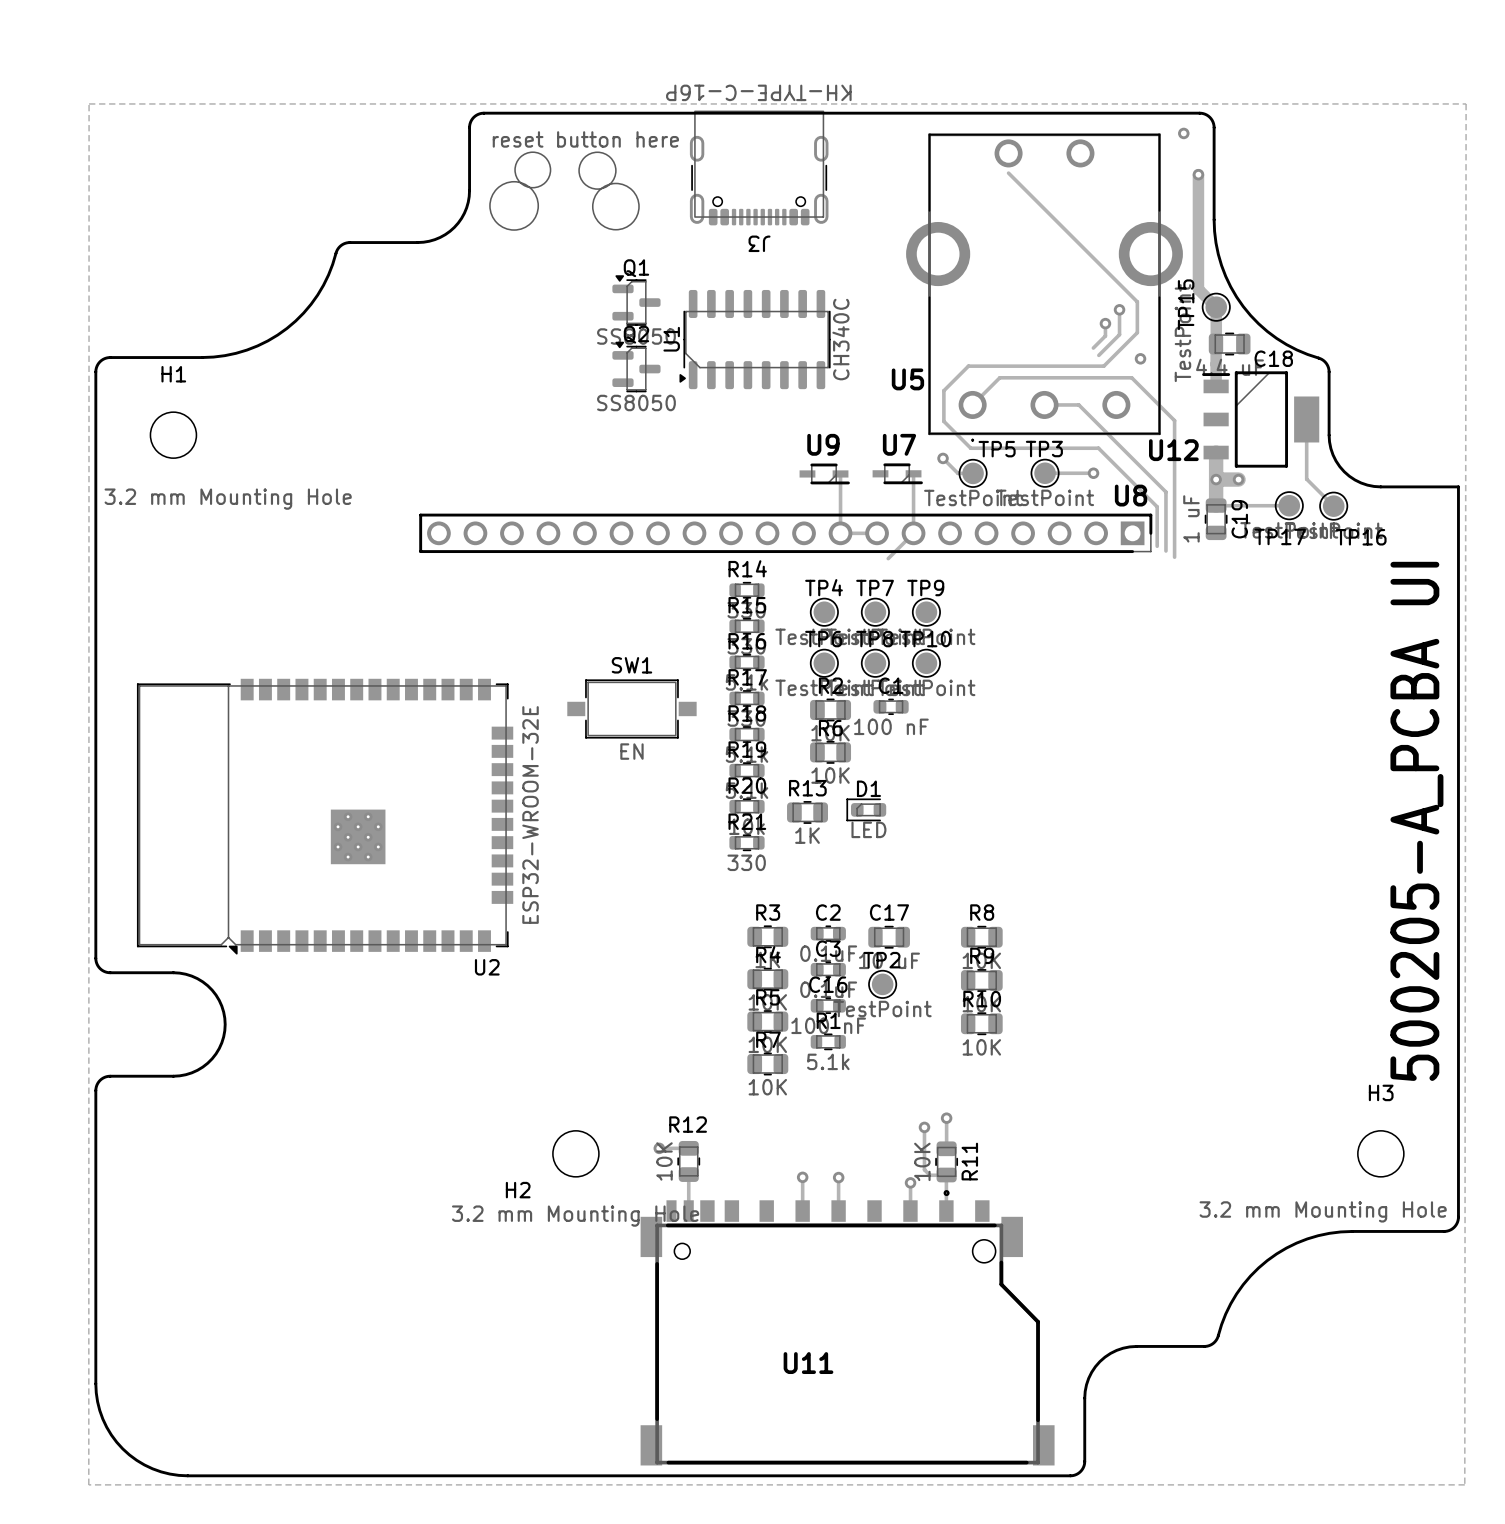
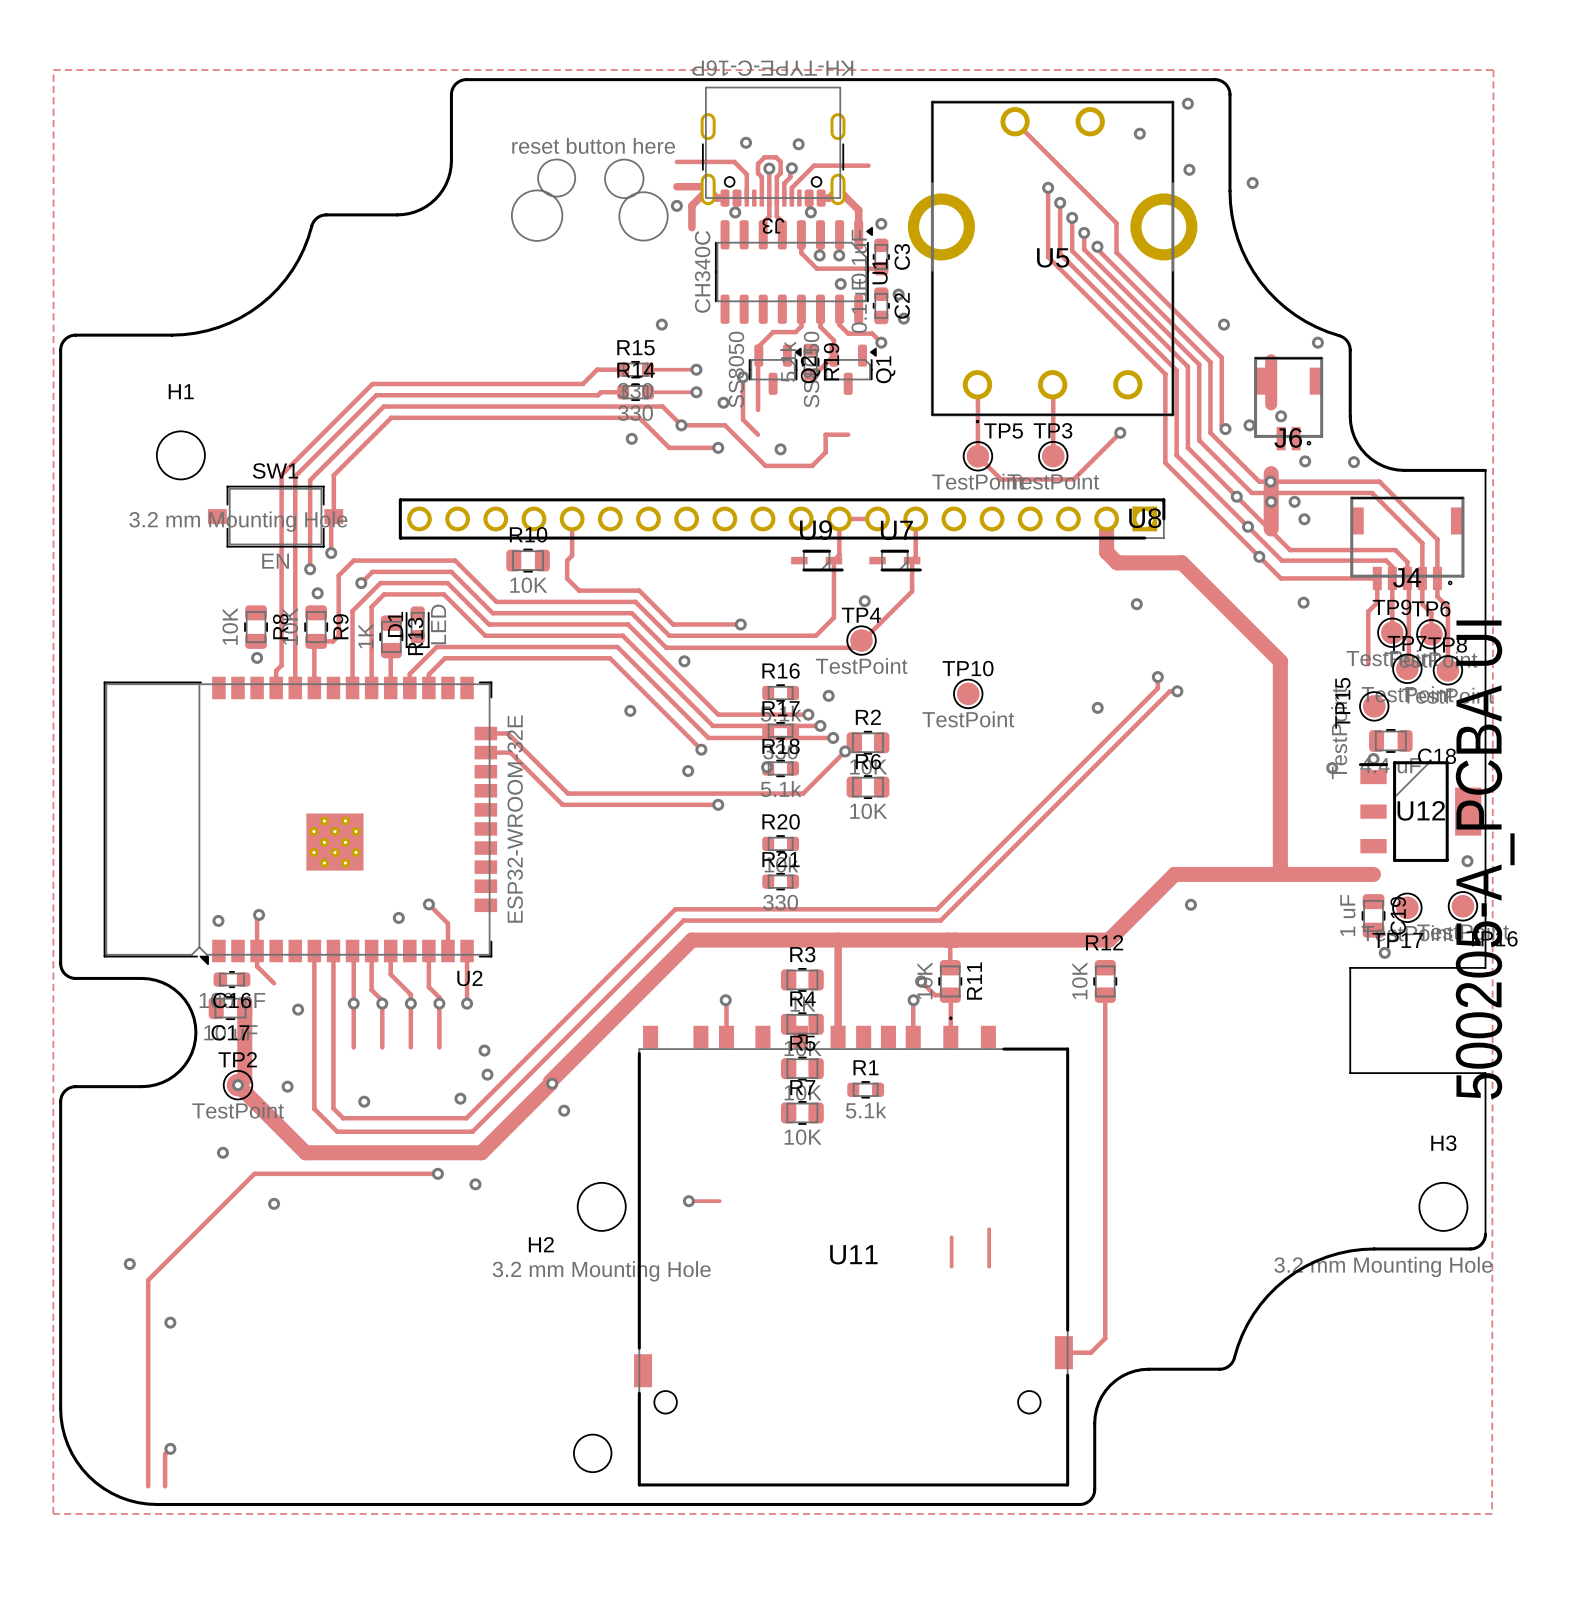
via: none -> (1187, 103)
zone outline: (89, 103) (88, 1484) (1464, 1484) (1466, 103) (89, 103) -> (53, 70) (53, 1513) (1492, 1513) (1493, 70) (53, 70)
board edge: (483, 113) (1205, 114) (1211, 118) (1213, 125) (1214, 231) (1218, 254) (1225, 276) (1243, 306) (1267, 331) (1286, 344) (1320, 358) (1327, 364) (1329, 371) (1329, 441) (1333, 454) (1339, 466) (1354, 479) (1374, 486) (1458, 486) (1457, 1221) (1453, 1228) (1445, 1231) (1340, 1231) (1307, 1238) (1276, 1253) (1250, 1276) (1230, 1303) (1217, 1338) (1211, 1344) (1204, 1346) (1129, 1346) (1110, 1353) (1095, 1366) (1086, 1384) (1084, 1463) (1081, 1470) (1076, 1474) (178, 1475) (152, 1468) (129, 1454) (116, 1442) (102, 1419) (97, 1401) (95, 1383) (96, 1086) (101, 1079) (108, 1076) (179, 1075) (197, 1070) (212, 1058) (219, 1048) (223, 1036) (225, 1024) (223, 1012) (219, 1000) (212, 990) (197, 978) (179, 973) (108, 972) (100, 968) (96, 961) (96, 368) (101, 360) (108, 357) (213, 357) (247, 350) (277, 335) (303, 312) (323, 285) (337, 250) (342, 244) (349, 242) (423, 242) (445, 234) (458, 223) (466, 207) (469, 190) (469, 125) (473, 117) (483, 113) -> (466, 79) (457, 82) (451, 92) (451, 160) (448, 178) (439, 194) (426, 206) (403, 214) (326, 214) (318, 217) (312, 223) (298, 259) (278, 288) (250, 311) (218, 327) (183, 334) (73, 335) (65, 339) (61, 346) (61, 966) (66, 975) (73, 978) (141, 978) (162, 982) (174, 989) (188, 1005) (194, 1018) (195, 1032) (194, 1046) (184, 1065) (174, 1075) (162, 1082) (141, 1086) (73, 1086) (66, 1089) (61, 1097) (60, 1408) (62, 1427) (67, 1445) (82, 1469) (103, 1488) (120, 1497) (147, 1504) (1086, 1503) (1091, 1498) (1094, 1491) (1094, 1423) (1096, 1409) (1105, 1390) (1121, 1376) (1141, 1369) (1219, 1369) (1227, 1366) (1233, 1360) (1247, 1324) (1268, 1295) (1295, 1272) (1327, 1256) (1362, 1249) (1472, 1248) (1479, 1245) (1484, 1238) (1485, 1073) (1350, 1073) (1350, 967) (1485, 967) (1485, 470) (1397, 469) (1377, 463) (1361, 449) (1354, 437) (1350, 423) (1350, 350) (1348, 342) (1341, 336) (1305, 321) (1285, 307) (1260, 281) (1242, 250) (1234, 227) (1230, 203) (1229, 92) (1226, 85) (1220, 80) (466, 79)
track: none -> (1015, 121) (1116, 223) (1116, 252) (1221, 357) (1221, 425) (1225, 429)
via: none -> (1139, 133)
via: (1183, 133) -> none
via: none -> (746, 142)
via: none -> (798, 144)
track: none -> (676, 161) (734, 161) (746, 174) (746, 198)
track: none -> (868, 165) (814, 165) (791, 187) (791, 198)
track: none -> (769, 168) (769, 189)
via: none -> (769, 168)
track: none -> (791, 168) (790, 177) (784, 183) (784, 198)
via: none -> (791, 168)
via: none -> (1189, 169)
J3 position: (759, 168) -> (773, 146)
track: (1008, 173) (1137, 301) (1137, 332) (1103, 366) (968, 366) (943, 390) (943, 421) (970, 448) (1098, 448) (1157, 506) (1157, 546) -> none
track: (1198, 174) (1198, 289) (1216, 307) (1215, 344) -> none
track: none -> (676, 186) (705, 186)
track: none -> (1048, 187) (1048, 256) (1165, 374) (1165, 462) (1280, 578) (1377, 578) (1377, 602) (1368, 611) (1368, 664)
via: none -> (1048, 187)
track: none -> (761, 189) (761, 177) (758, 173) (758, 163) (764, 157) (776, 157) (780, 161) (780, 173) (776, 177) (776, 189)
track: none -> (724, 198) (716, 198) (708, 189) (691, 205) (691, 227)
track: none -> (769, 198) (769, 216) (763, 222)
track: none -> (776, 198) (776, 216) (782, 222)
track: none -> (821, 198) (829, 198) (838, 189) (858, 210) (858, 234)
track: none -> (1060, 202) (1060, 253) (1176, 370) (1176, 455) (1281, 560) (1386, 560) (1392, 566) (1392, 632)
via: none -> (1060, 202)
via: none -> (676, 205)
via: none -> (735, 212)
via: none -> (810, 212)
track: none -> (1072, 217) (1072, 250) (1187, 366) (1187, 447) (1290, 550) (1395, 550) (1407, 562) (1407, 578)
via: none -> (1072, 217)
via: none -> (881, 223)
track: none -> (1084, 232) (1084, 249) (1199, 364) (1199, 440) (1251, 492) (1372, 492) (1422, 543) (1422, 604) (1431, 613) (1431, 634)
via: none -> (1084, 232)
track: none -> (801, 234) (801, 253) (816, 268) (881, 268)
track: none -> (1097, 246) (1097, 249) (1210, 362) (1210, 432) (1259, 481) (1379, 481) (1437, 539) (1437, 596) (1447, 607) (1447, 670)
via: none -> (1097, 246)
via: none -> (819, 255)
via: none -> (839, 255)
via: none -> (840, 284)
via: none -> (898, 294)
U5 position: (1044, 287) -> (1052, 261)
track: none -> (801, 309) (801, 326) (795, 332) (773, 332) (758, 346) (758, 355)
track: none -> (820, 309) (820, 326) (833, 340) (833, 355) (814, 374)
track: none -> (839, 309) (839, 324) (848, 333) (872, 333) (881, 342)
Q1 rotation: 0° (636, 300) -> 90° clockwise (850, 369)
Q1 position: (636, 300) -> (850, 369)
via: none -> (903, 318)
TP15 position: (1216, 307) -> (1374, 706)
track: (1119, 309) (1119, 334) (1098, 355) -> none
via: (1119, 309) -> none
via: none -> (661, 324)
via: none -> (1223, 324)
track: (1105, 323) (1105, 335) (1093, 348) -> none
via: (1105, 323) -> none
via: none -> (881, 342)
via: none -> (1317, 342)
U1 rotation: 0° (755, 339) -> 180° (793, 272)
track: none -> (758, 356) (758, 409)
C18 position: (1229, 344) -> (1390, 740)
track: none -> (623, 369) (597, 369) (582, 383) (372, 383) (281, 474) (281, 665) (276, 670) (276, 687)
track: none -> (647, 369) (696, 369)
via: none -> (696, 369)
via: (1140, 358) -> none
track: none -> (743, 377) (743, 419) (758, 434)
via: none -> (743, 377)
Q2 rotation: 0° (636, 367) -> 90° clockwise (775, 369)
Q2 position: (636, 367) -> (775, 369)
track: none -> (977, 385) (977, 456) (1001, 479) (1073, 479) (1120, 432)
track: none -> (1053, 385) (1053, 456)
track: none -> (623, 392) (600, 392) (597, 395) (376, 395) (295, 476) (295, 687)
track: none -> (647, 392) (696, 392)
via: none -> (696, 392)
U5 name position: U5 (907, 379) -> U5 (1053, 257)
via: none -> (723, 402)
J6: none -> (1288, 403)
via: none -> (1281, 416)
track: (972, 404) (999, 377) (1131, 377) (1174, 420) (1174, 557) -> none
track: (1044, 404) (1078, 404) (1165, 492) (1165, 551) -> none
via: none -> (681, 425)
via: none -> (1249, 425)
via: none -> (1225, 429)
via: none -> (1120, 432)
track: none -> (848, 434) (825, 434) (825, 452) (812, 465) (765, 465) (724, 425) (681, 425) (662, 406) (383, 406) (310, 480) (310, 569)
via: none -> (631, 438)
U12 position: (1260, 419) -> (1420, 811)
track: (1306, 419) (1306, 479) (1333, 506) -> none
track: none -> (718, 447) (669, 447) (639, 417) (391, 417) (333, 475) (333, 516)
via: none -> (718, 447)
via: none -> (780, 449)
via: none -> (1305, 461)
via: none -> (1354, 462)
U12 name position: U12 (1173, 450) -> U12 (1421, 810)
track: (943, 458) (957, 473) (973, 473) -> none
via: (943, 458) -> none
via: none -> (1270, 481)
U9 position: (824, 473) -> (817, 560)
track: (840, 473) (840, 533) (877, 533) -> none
U7 position: (897, 473) -> (895, 560)
track: (913, 473) (913, 533) (888, 558) -> none
TP5 position: (973, 473) -> (977, 456)
track: (1045, 473) (1093, 473) -> none
TP3 position: (1045, 473) -> (1053, 456)
via: (1093, 473) -> none
via: none -> (1236, 496)
track: (1216, 479) (1238, 479) -> none
track: none -> (572, 518) (572, 555) (567, 560) (567, 578) (579, 590) (639, 590) (673, 624) (740, 624)
track: none -> (877, 518) (839, 518) (839, 555) (833, 560) (833, 617) (815, 635) (669, 635) (635, 601) (496, 601) (455, 560) (353, 560) (338, 575) (338, 635) (333, 641) (316, 641)
track: none -> (915, 518) (915, 556) (912, 560) (912, 591) (855, 647) (666, 647) (631, 613) (492, 613) (451, 571) (372, 571) (361, 583)
track: none -> (1106, 518) (1106, 552) (1117, 562) (1181, 562) (1280, 661) (1280, 874)
U8 name position: U8 (1131, 495) -> U8 (1145, 518)
track: none -> (331, 519) (331, 553)
via: none -> (1304, 519)
via: none -> (1248, 526)
track: (1216, 505) (1289, 505) -> none
TP17 position: (1289, 505) -> (1407, 907)
TP16 position: (1333, 506) -> (1462, 906)
C19 position: (1216, 519) -> (1373, 915)
J4: none -> (1407, 543)
via: none -> (331, 553)
via: none -> (1259, 556)
U8 position: (785, 533) -> (782, 518)
via: none -> (310, 569)
track: none -> (1408, 579) (1408, 667)
via: none -> (361, 583)
via: none -> (317, 593)
via: none -> (864, 601)
via: none -> (1303, 602)
via: none -> (1136, 604)
R14 position: (747, 590) -> (635, 392)
via: none -> (740, 624)
TP7 position: (875, 612) -> (1407, 668)
TP9 position: (926, 612) -> (1392, 632)
track: none -> (314, 643) (314, 687)
track: none -> (390, 651) (390, 687)
R15 position: (747, 626) -> (635, 369)
via: none -> (257, 657)
via: none -> (684, 661)
track: none -> (1157, 677) (1157, 688) (936, 909) (675, 909) (466, 1118) (343, 1118) (333, 1108) (333, 951)
via: none -> (1157, 677)
track: none -> (352, 687) (352, 611) (380, 583) (447, 583) (489, 624) (628, 624) (718, 714) (808, 714)
track: none -> (371, 687) (371, 606) (384, 594) (443, 594) (485, 635) (622, 635) (712, 725) (820, 725)
track: none -> (409, 687) (409, 673) (436, 647) (617, 647) (708, 737) (833, 737)
track: none -> (428, 687) (428, 674) (445, 658) (610, 658) (701, 749)
track: none -> (1177, 691) (1169, 691) (940, 920) (683, 920) (472, 1131) (337, 1131) (314, 1108) (314, 951)
via: none -> (1177, 691)
TP6 position: (824, 663) -> (1431, 634)
TP8 position: (875, 663) -> (1447, 670)
via: none -> (828, 695)
via: none -> (1097, 707)
via: none -> (630, 710)
via: none -> (808, 714)
via: none -> (820, 725)
track: none -> (485, 733) (507, 733) (567, 793) (803, 793) (845, 751)
via: none -> (833, 737)
C1: 100 nF (891, 706) -> none
SW1 position: (631, 708) -> (275, 516)
via: none -> (701, 749)
via: none -> (845, 751)
track: none -> (485, 752) (510, 752) (562, 804) (718, 804)
via: none -> (1373, 758)
via: none -> (767, 767)
via: none -> (1332, 768)
via: none -> (688, 771)
via: none -> (718, 804)
R19 rotation: 0° (747, 770) -> 90° clockwise (810, 362)
R19 position: (747, 770) -> (810, 362)
D1 rotation: 0° (866, 809) -> 90° counterclockwise (417, 627)
D1 position: (866, 809) -> (417, 627)
R13 rotation: 0° (807, 812) -> 90° clockwise (391, 636)
R13 position: (807, 812) -> (391, 636)
U2 position: (325, 816) -> (300, 820)
via: none -> (1467, 861)
track: none -> (1373, 874) (1174, 874) (1109, 940) (691, 940) (481, 1152) (305, 1152) (238, 1085) (244, 1078) (244, 1008)
track: none -> (428, 904) (447, 923) (447, 951)
via: none -> (428, 904)
via: none -> (1190, 904)
track: none -> (259, 914) (257, 916) (257, 966) (274, 983)
via: none -> (259, 914)
via: none -> (398, 917)
via: none -> (218, 920)
track: none -> (838, 940) (838, 1037)
track: none -> (947, 940) (950, 942) (950, 967)
track: none -> (371, 951) (371, 989) (382, 1000) (382, 1047)
track: none -> (390, 951) (390, 974) (410, 994) (410, 1047)
track: none -> (428, 951) (428, 987) (439, 997) (439, 1047)
track: none -> (467, 951) (467, 1003)
track: none -> (353, 952) (353, 1047)
via: none -> (1384, 952)
C17 name position: C17 (889, 912) -> C17 (230, 1032)
C2 rotation: 0° (828, 933) -> 90° clockwise (881, 305)
C2 position: (828, 933) -> (881, 305)
C17 position: (889, 937) -> (230, 1008)
R8 rotation: 0° (981, 937) -> 90° clockwise (256, 627)
R8 position: (981, 937) -> (256, 627)
track: none -> (921, 981) (934, 995) (950, 995)
via: none -> (921, 981)
track: none -> (950, 995) (950, 1037)
track: none -> (1105, 995) (1105, 1338) (1090, 1352) (1063, 1352)
track: none -> (725, 1000) (726, 1037)
via: none -> (725, 1000)
track: none -> (913, 1000) (913, 1037)
via: none -> (913, 1000)
via: none -> (353, 1003)
via: none -> (382, 1003)
via: none -> (410, 1003)
via: none -> (439, 1003)
via: none -> (467, 1003)
via: none -> (298, 1009)
C3 rotation: 0° (828, 969) -> 90° clockwise (881, 256)
C3 position: (828, 969) -> (881, 256)
R9 rotation: 0° (981, 980) -> 90° clockwise (316, 627)
R9 position: (981, 980) -> (316, 627)
C16 name position: C16 (828, 984) -> C16 (232, 1000)
TP2 position: (882, 984) -> (238, 1085)
via: none -> (484, 1050)
C16 position: (828, 1005) -> (231, 979)
R10 position: (981, 1023) -> (528, 560)
via: none -> (487, 1074)
via: none -> (552, 1083)
via: none -> (238, 1085)
via: none -> (287, 1086)
via: none -> (460, 1098)
via: none -> (364, 1101)
via: none -> (564, 1110)
via: none -> (222, 1152)
track: (946, 1118) (946, 1148) -> none
via: (946, 1118) -> none
track: none -> (437, 1173) (254, 1173) (148, 1280) (148, 1486)
via: none -> (437, 1173)
track: (924, 1127) (924, 1169) (929, 1175) (946, 1175) -> none
via: (924, 1127) -> none
via: none -> (475, 1184)
via: none -> (274, 1203)
R12 position: (688, 1161) -> (1105, 981)
R11 position: (946, 1161) -> (950, 981)
track: (688, 1174) (688, 1211) -> none
track: (802, 1177) (802, 1211) -> none
via: (802, 1177) -> none
track: (838, 1177) (838, 1211) -> none
via: (838, 1177) -> none
via: (910, 1182) -> none
U11 footprint: [640, 1190, 1055, 1466] -> [634, 1016, 1073, 1487]
via: none -> (129, 1264)
via: none -> (170, 1322)
U11 name position: U11 (808, 1363) -> U11 (853, 1254)
round board edge: none -> [573, 1433, 613, 1473]
track: none -> (170, 1448) (165, 1454) (165, 1486)
via: none -> (170, 1448)

